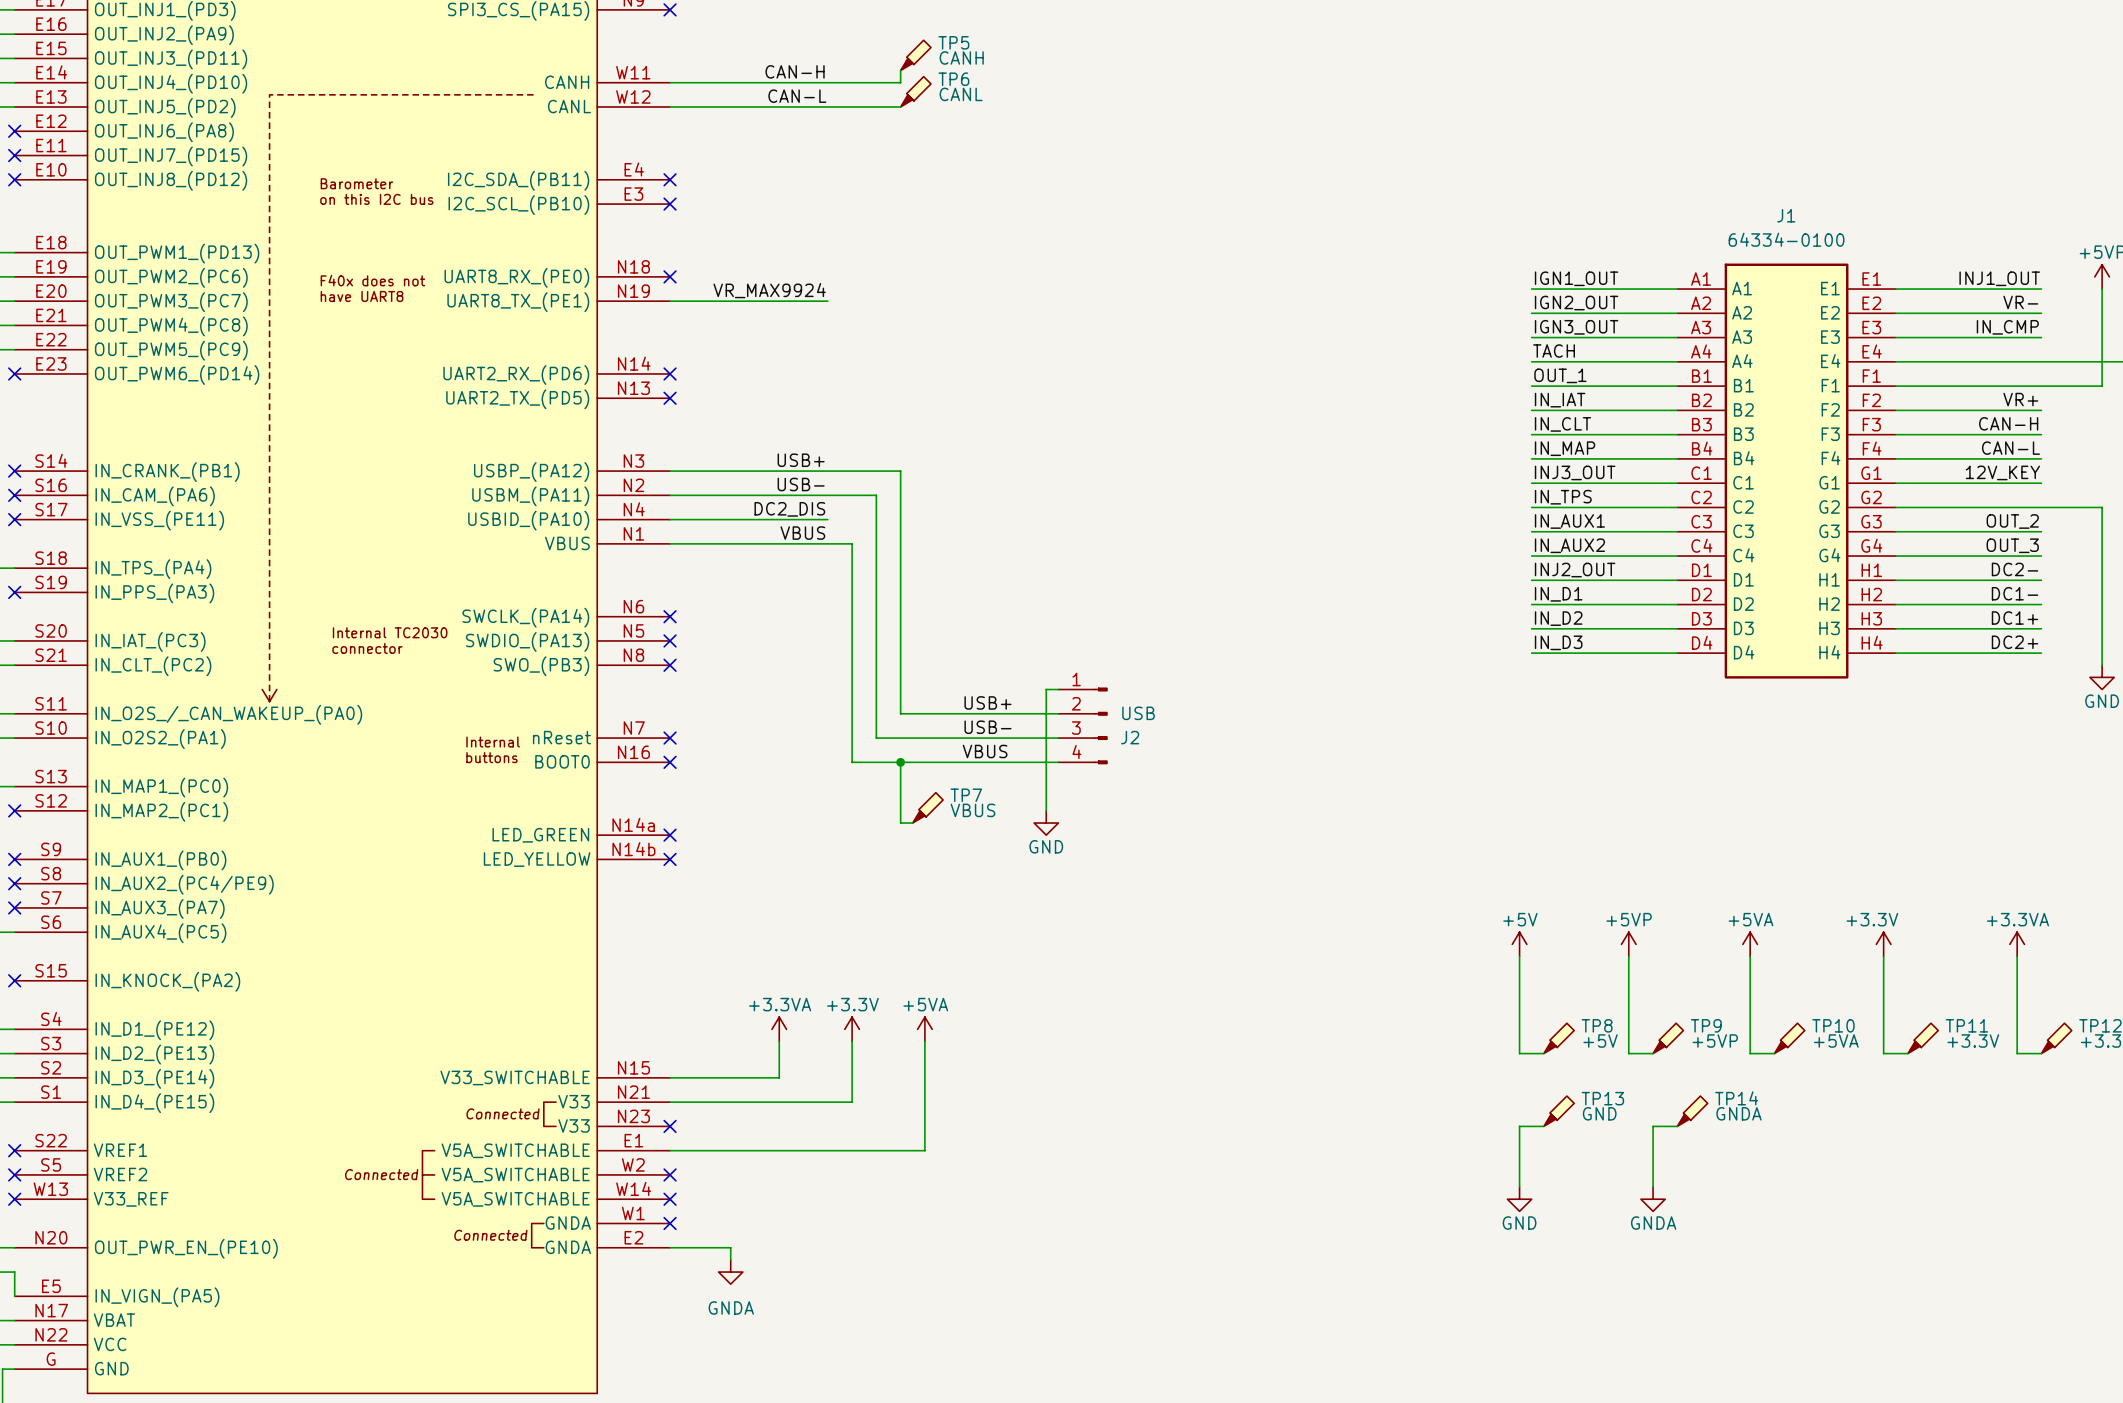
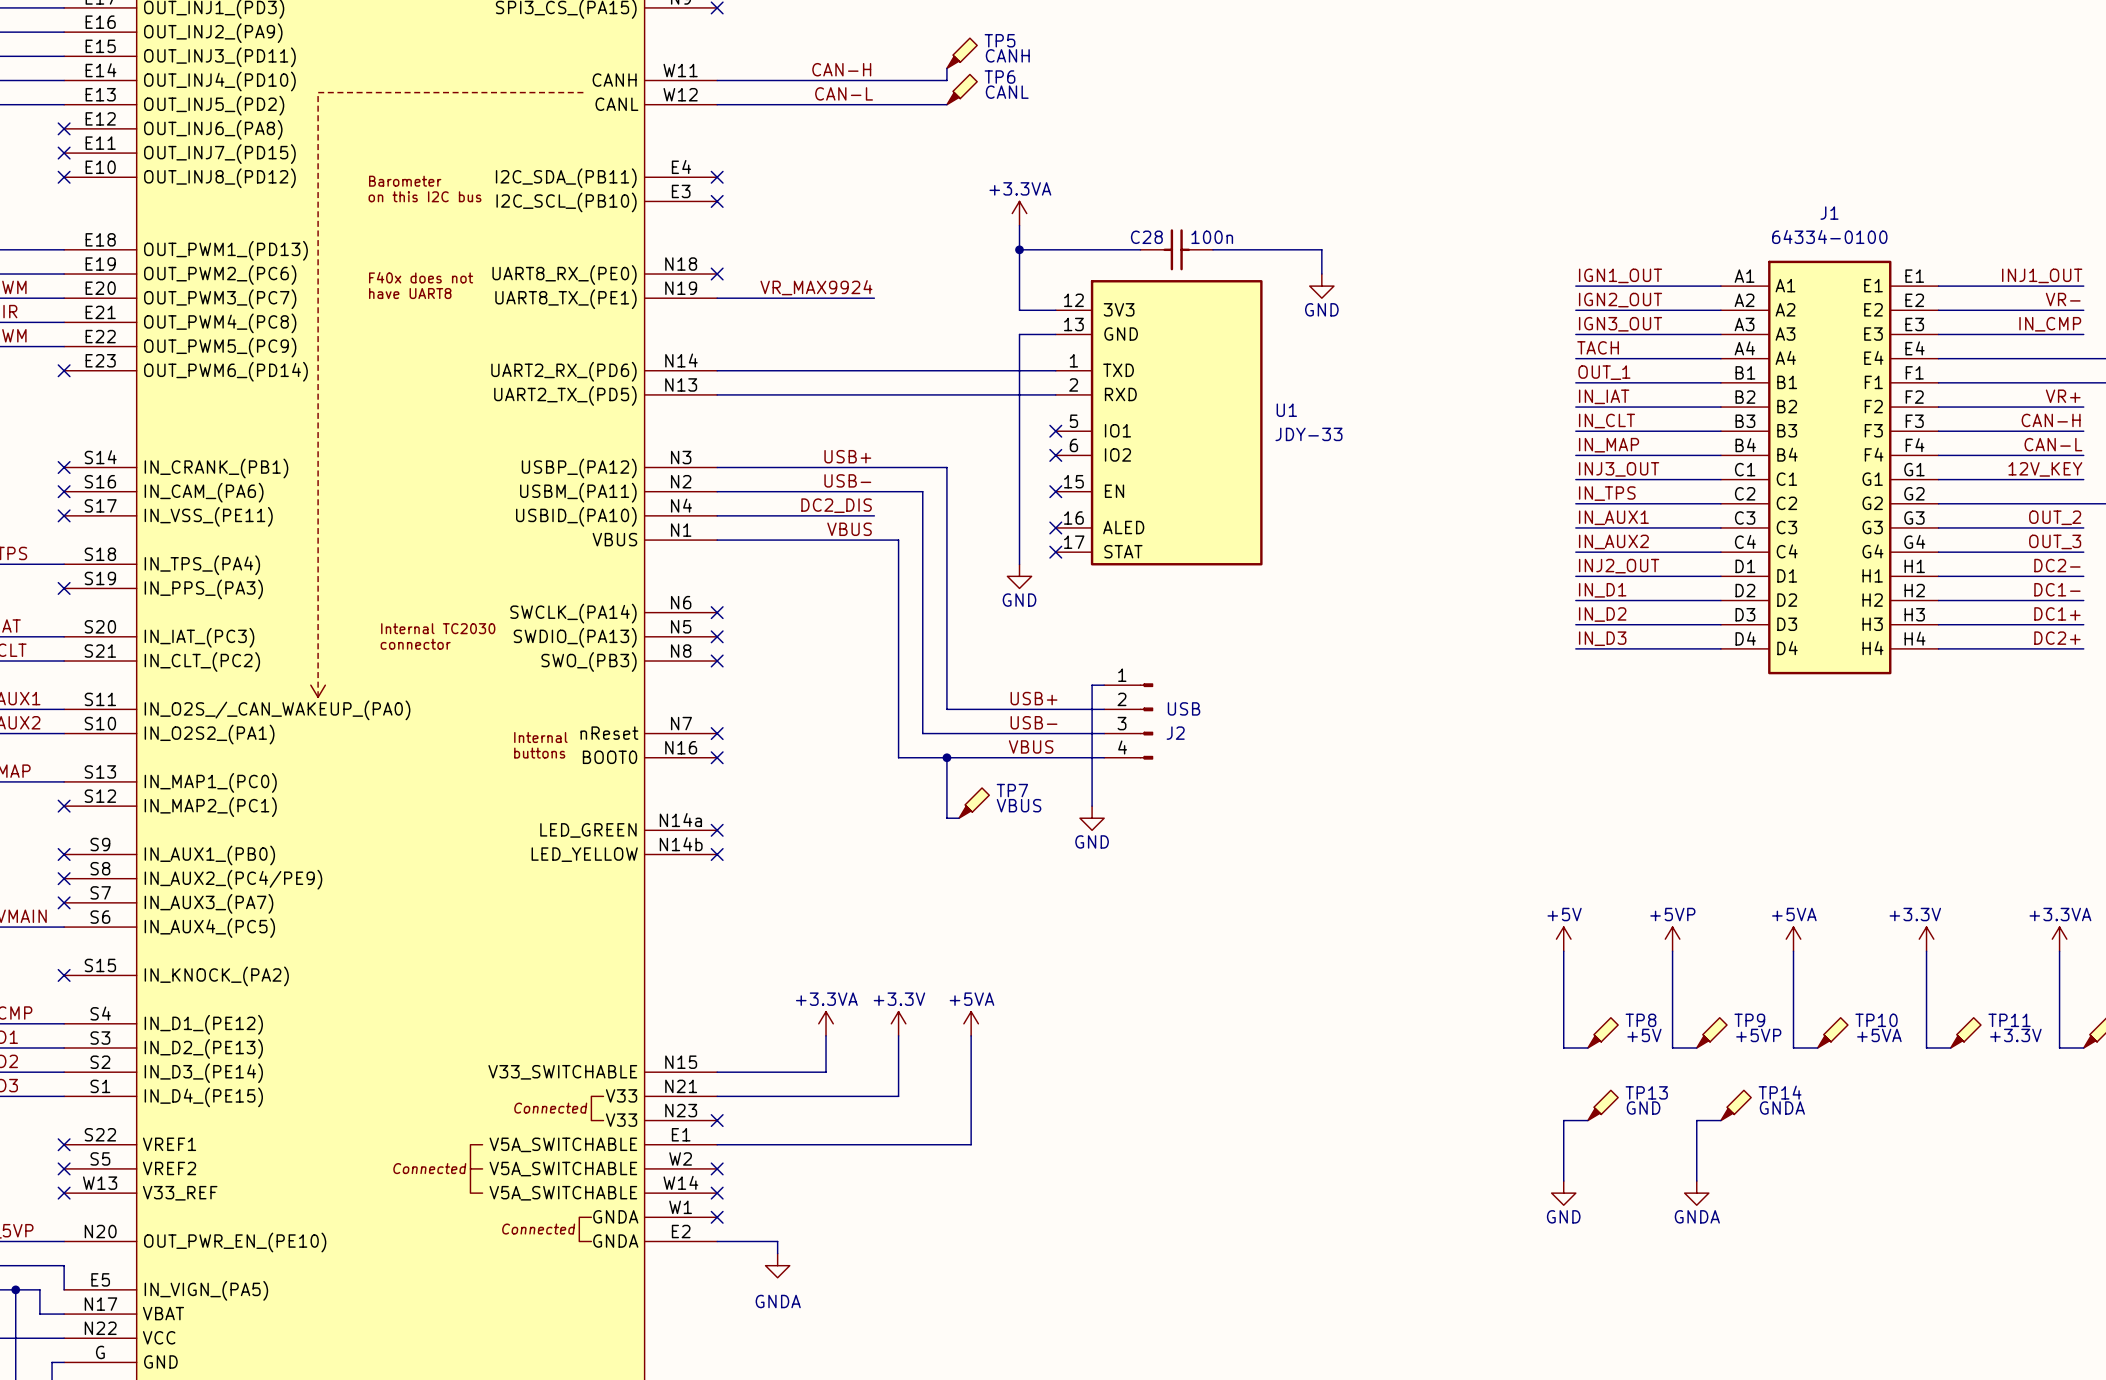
power symbol: none -> +3.3VA (1019, 213)
wire: none -> (1019, 225) (1019, 310) (1055, 310)
wire: none -> (1019, 249) (1140, 249)
junction: none -> (1019, 249)
C28: none -> 100n (1176, 249)
wire: none -> (1213, 249) (1321, 249) (1321, 274)
power symbol: none -> GND (1321, 286)
wire: none -> (1055, 334) (1019, 334) (1019, 564)
wire: none -> (717, 370) (1055, 370)
no-connect mark: (670, 373) -> none
wire: none -> (717, 394) (1055, 394)
no-connect mark: (670, 398) -> none
U1: none -> JDY-33 (1159, 422)
no-connect mark: none -> (1055, 431)
no-connect mark: none -> (1055, 455)
no-connect mark: none -> (1055, 491)
no-connect mark: none -> (1055, 527)
no-connect mark: none -> (1055, 552)
power symbol: none -> GND (1019, 576)

